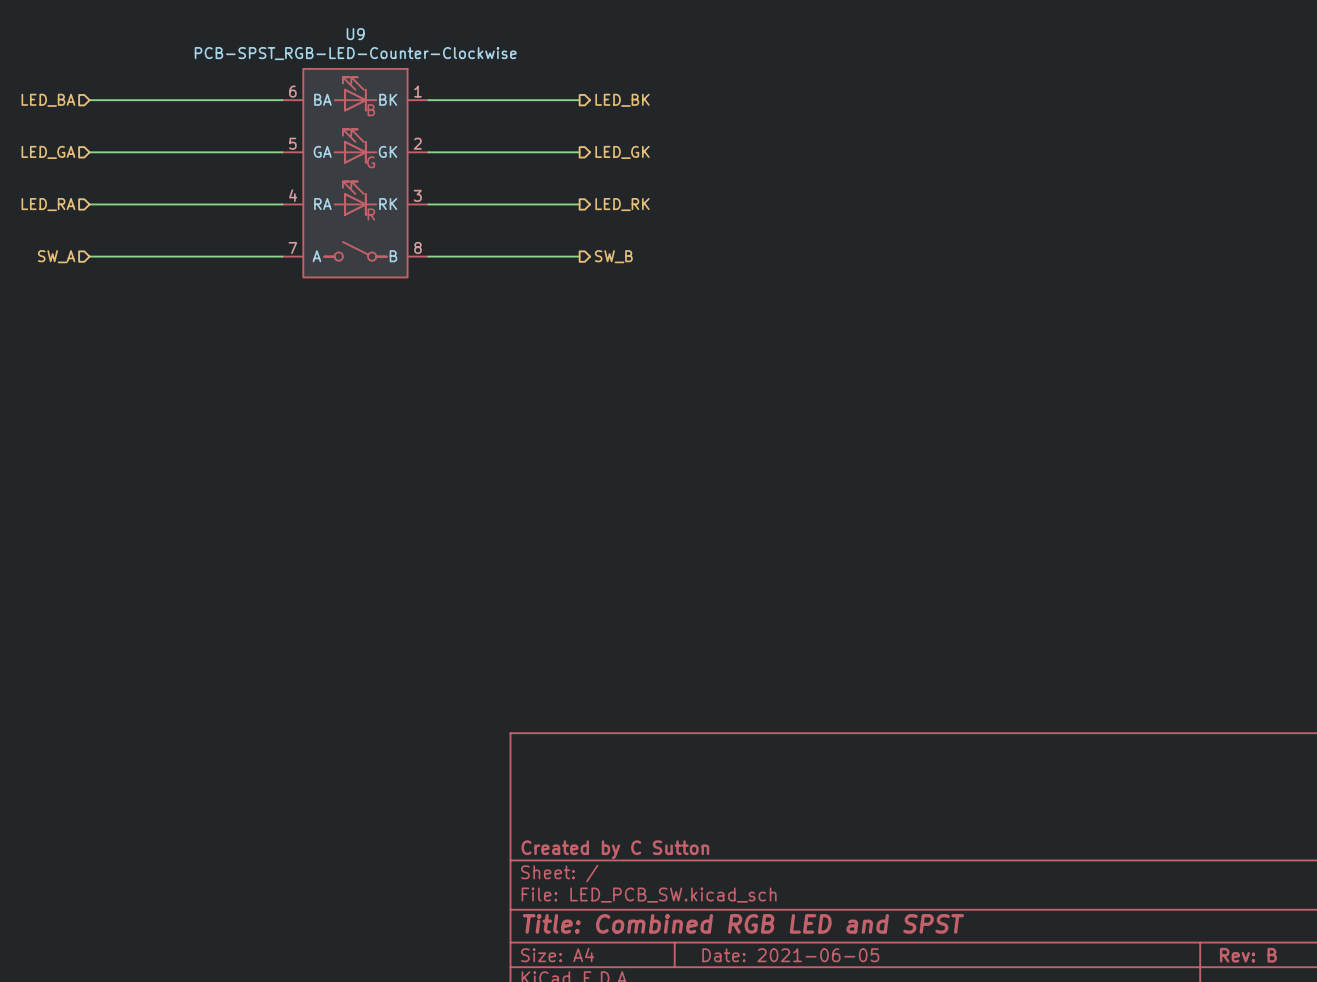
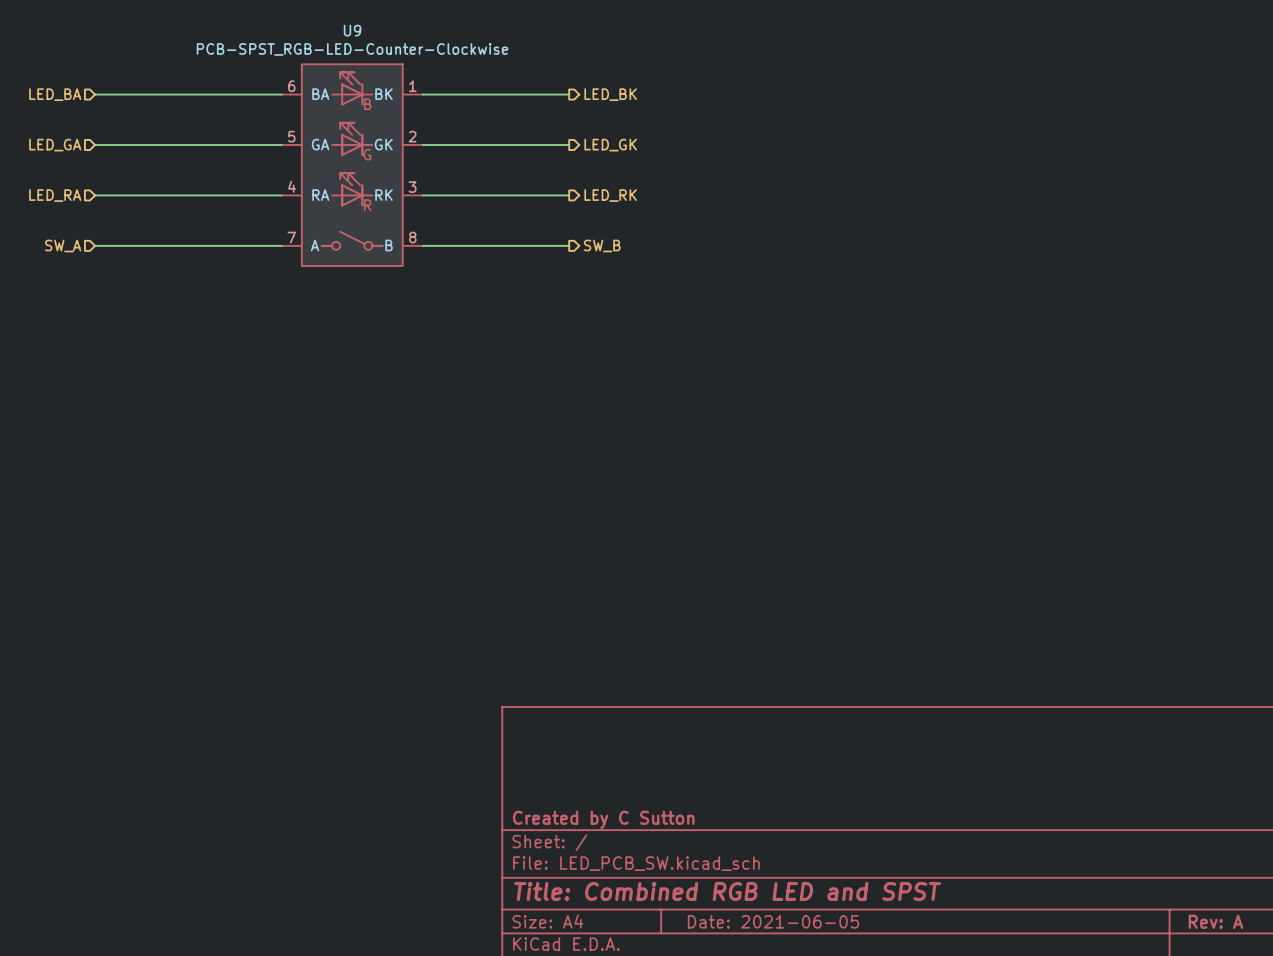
title block: Rev: B (1248, 955) -> Rev: A (1215, 921)

